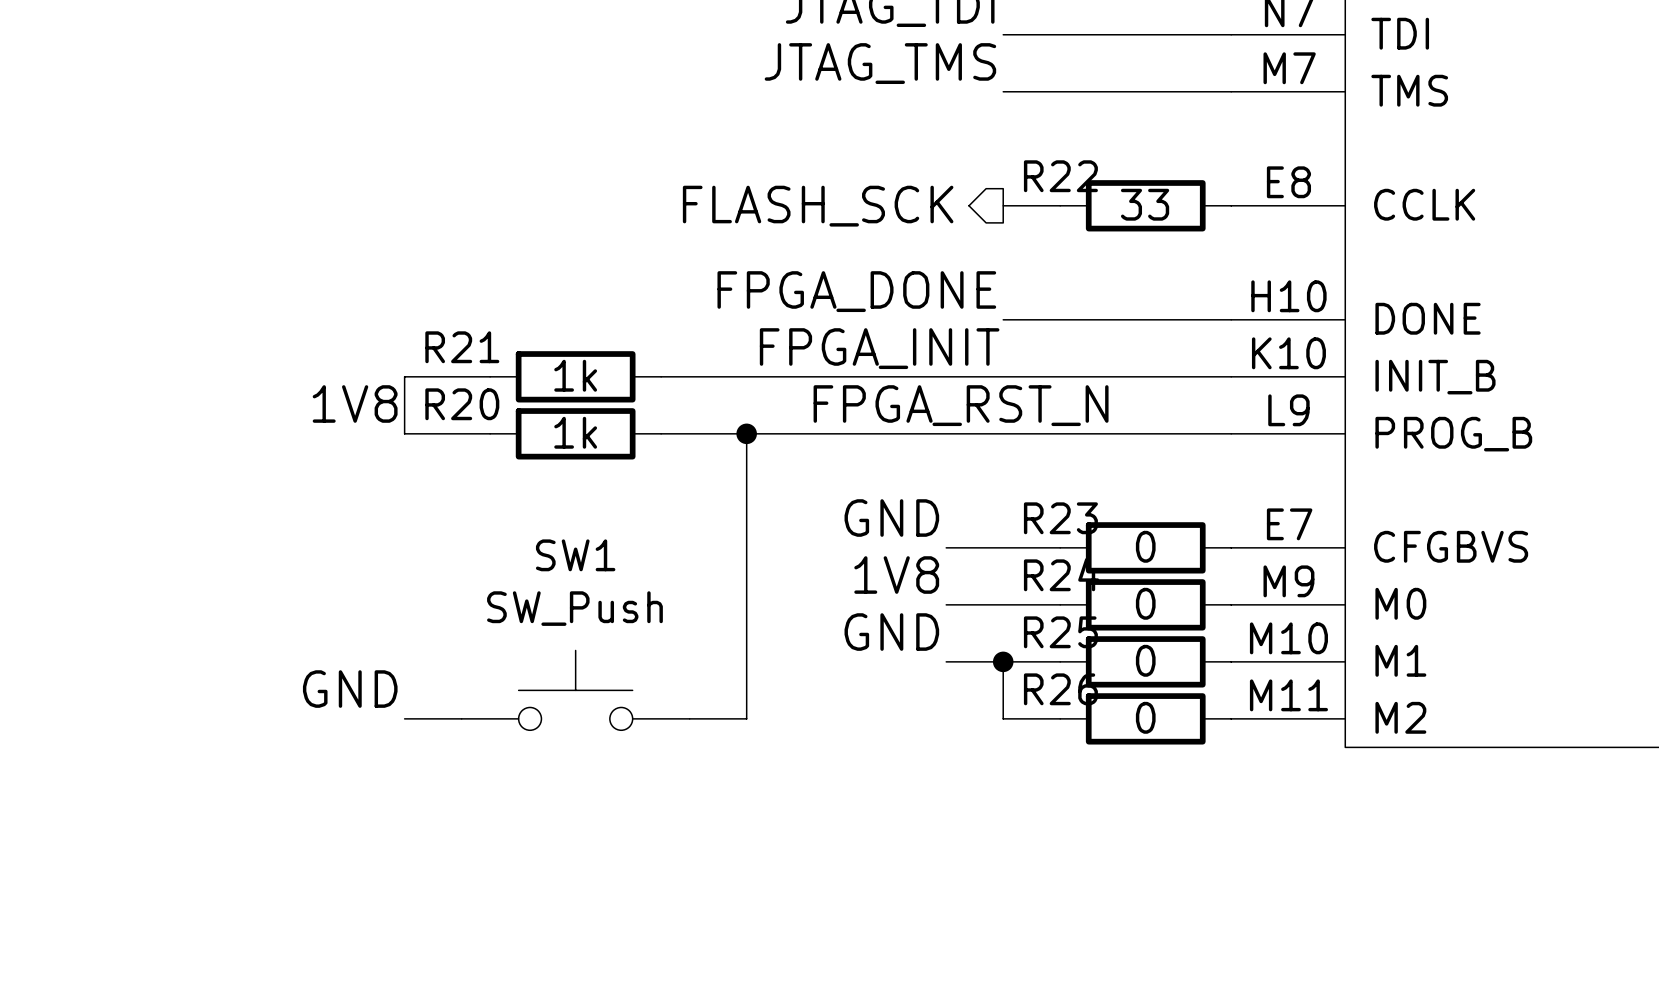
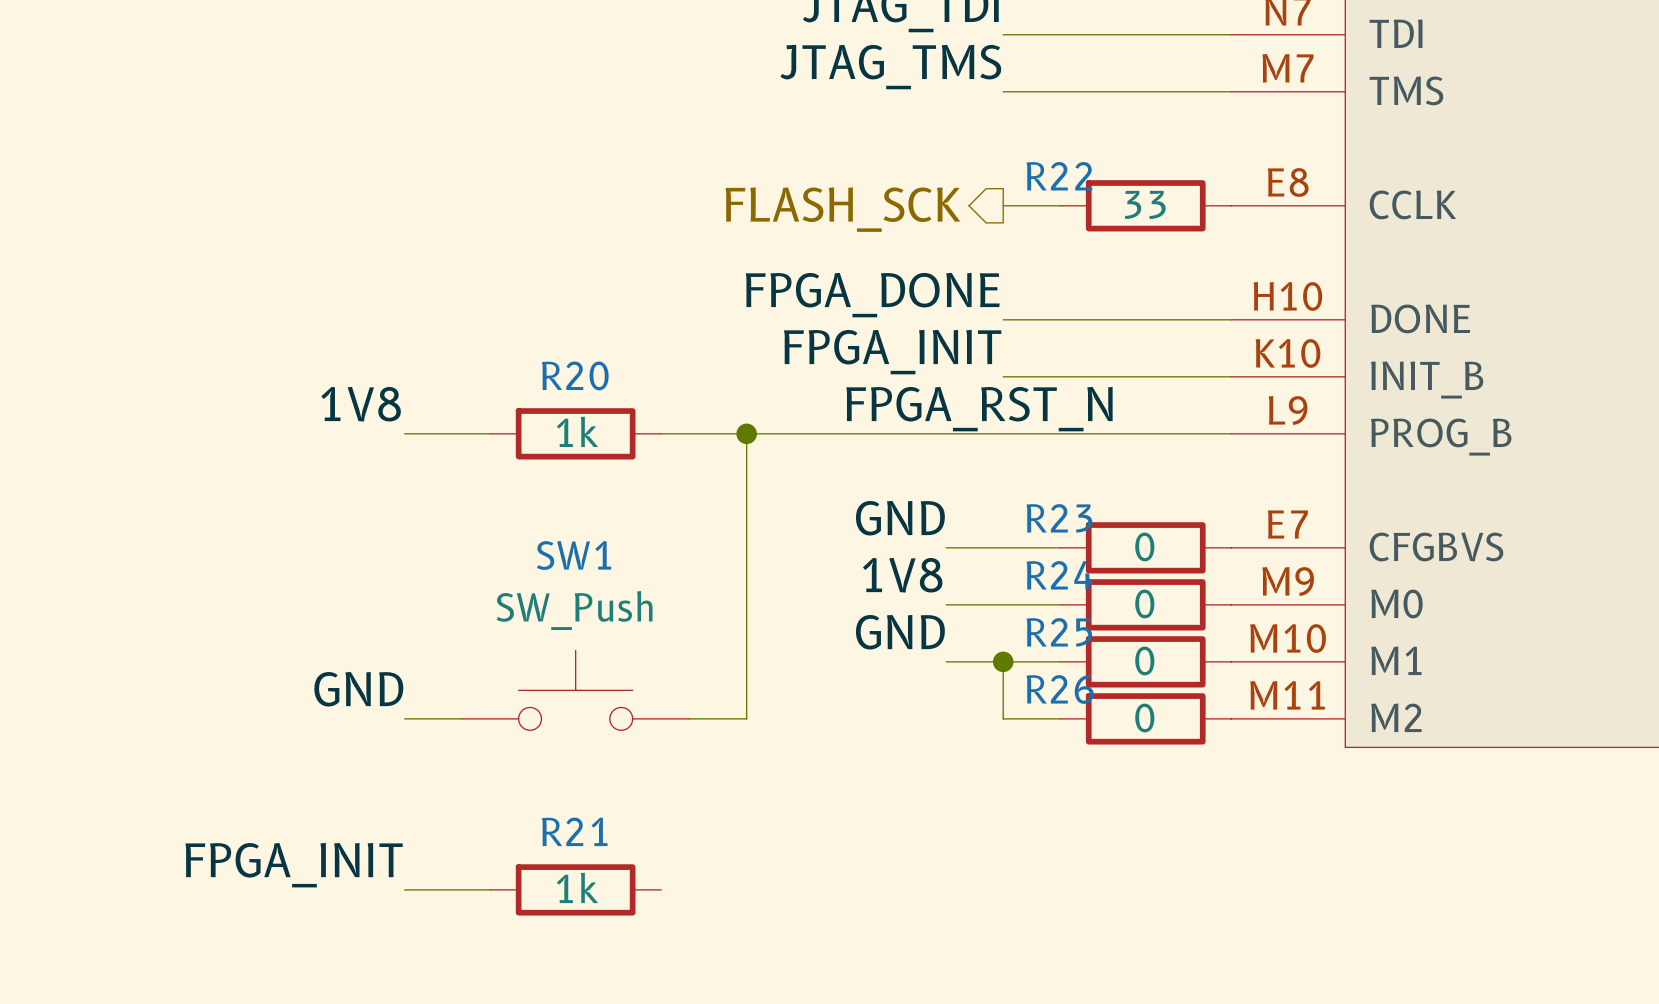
R21 name position: R21 (462, 347) -> R21 (574, 831)
wire: (490, 376) (404, 376) (404, 433) -> none
R21 position: (575, 376) -> (575, 889)
wire: (661, 376) (1003, 376) -> none
R20 name position: R20 (462, 404) -> R20 (575, 375)
label: none -> FPGA_INIT (294, 865)
wire: none -> (404, 889) (490, 889)

